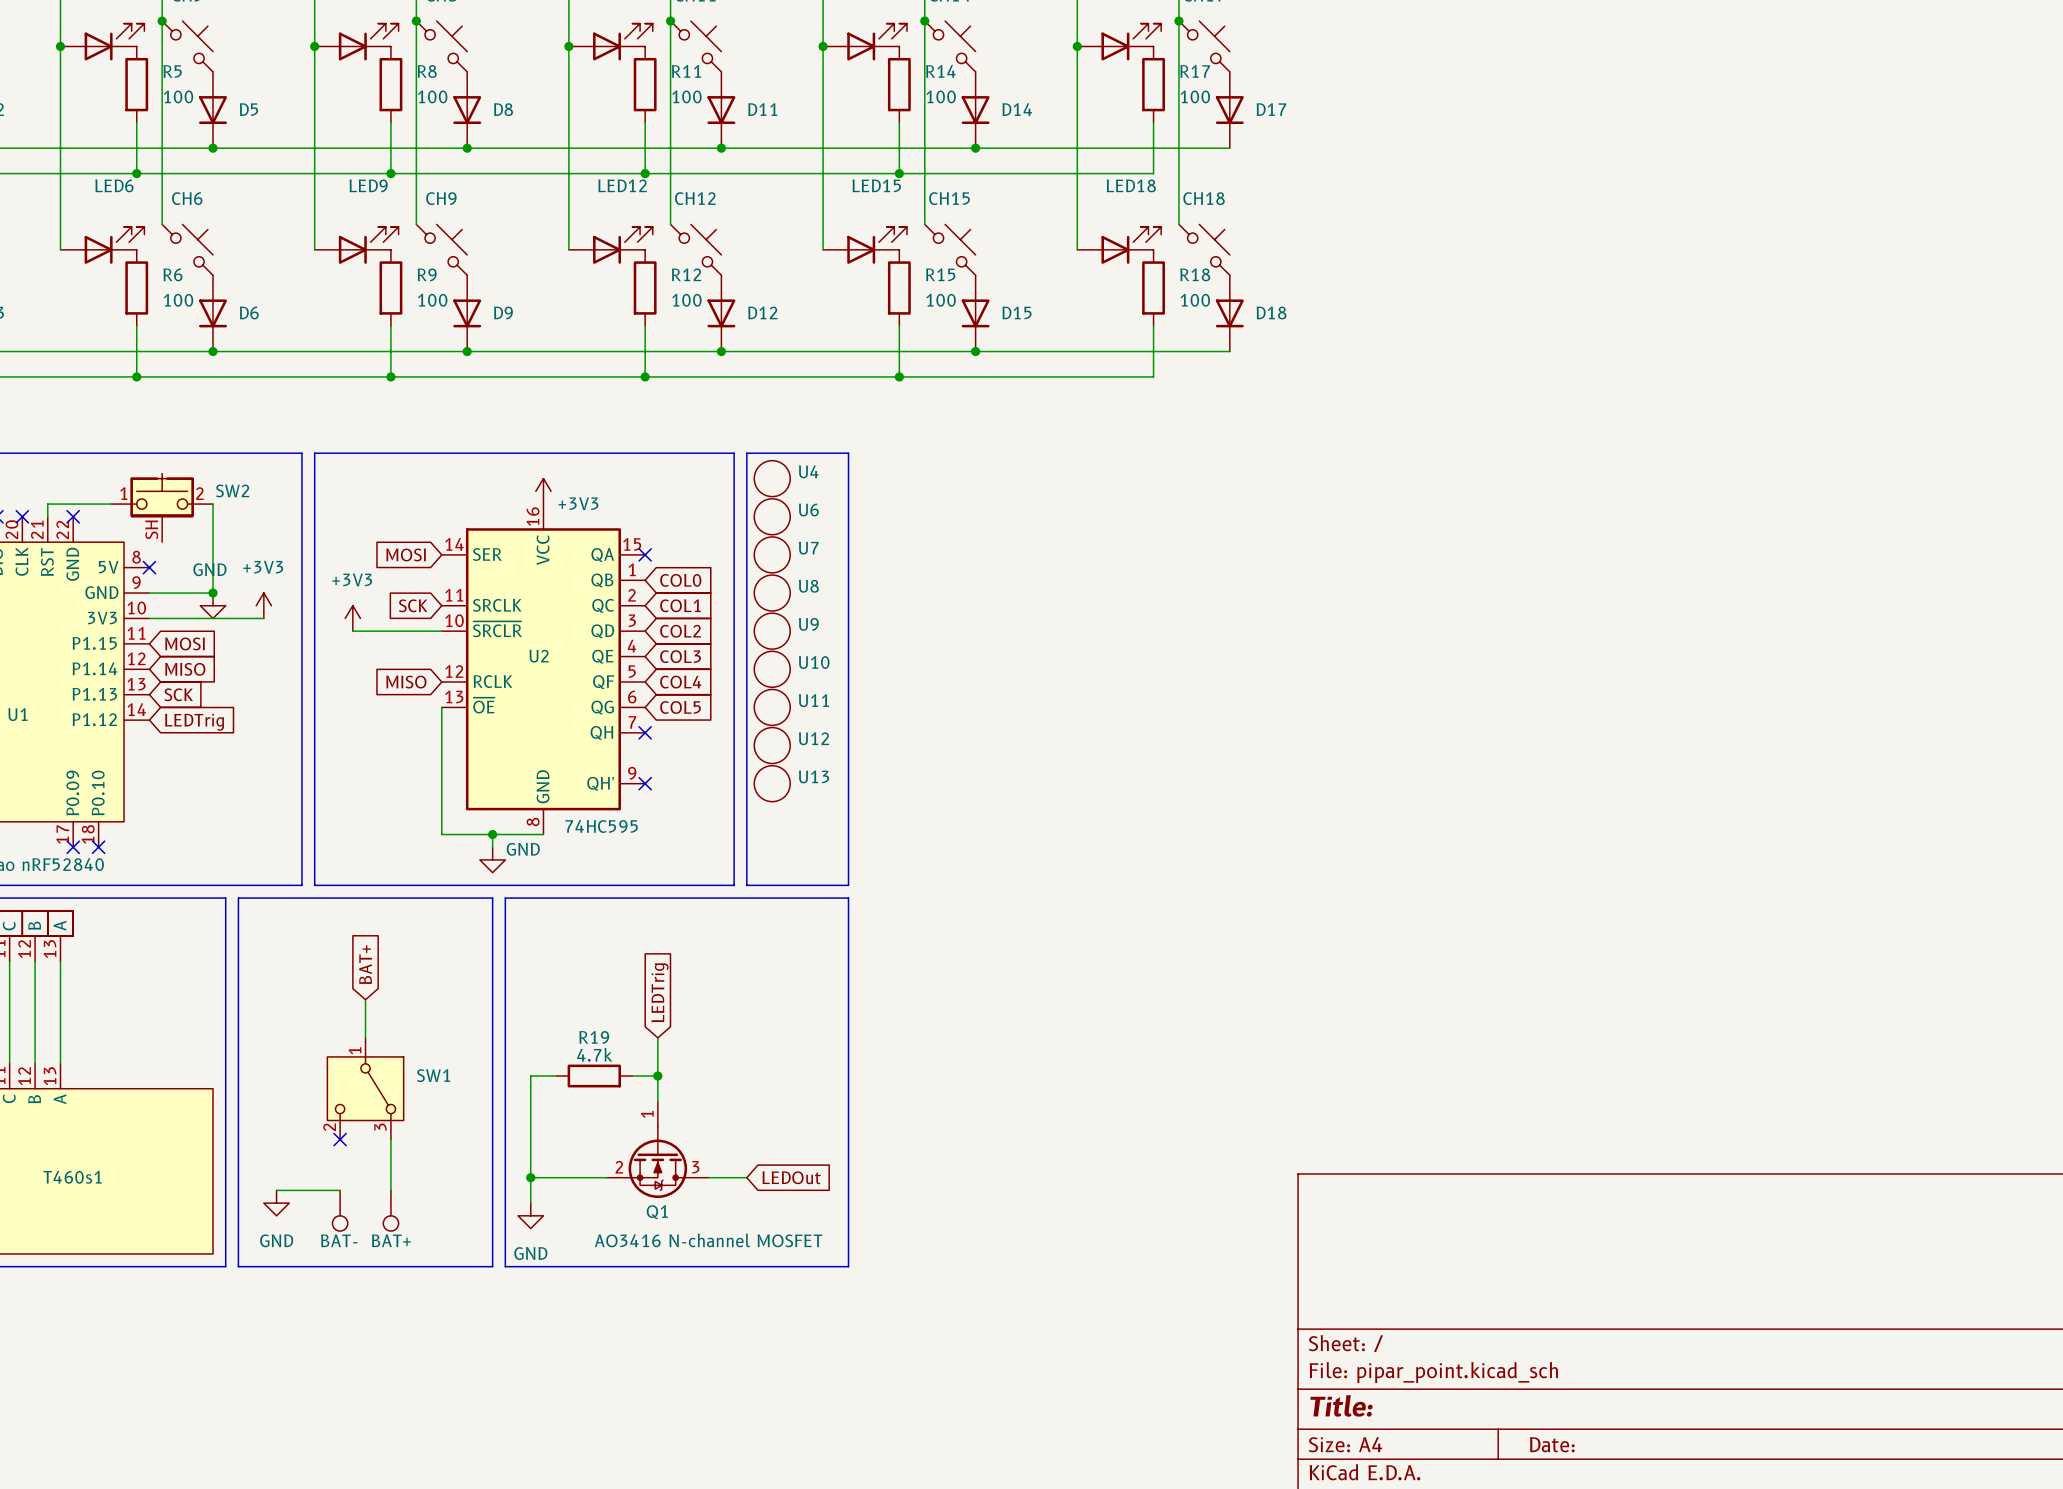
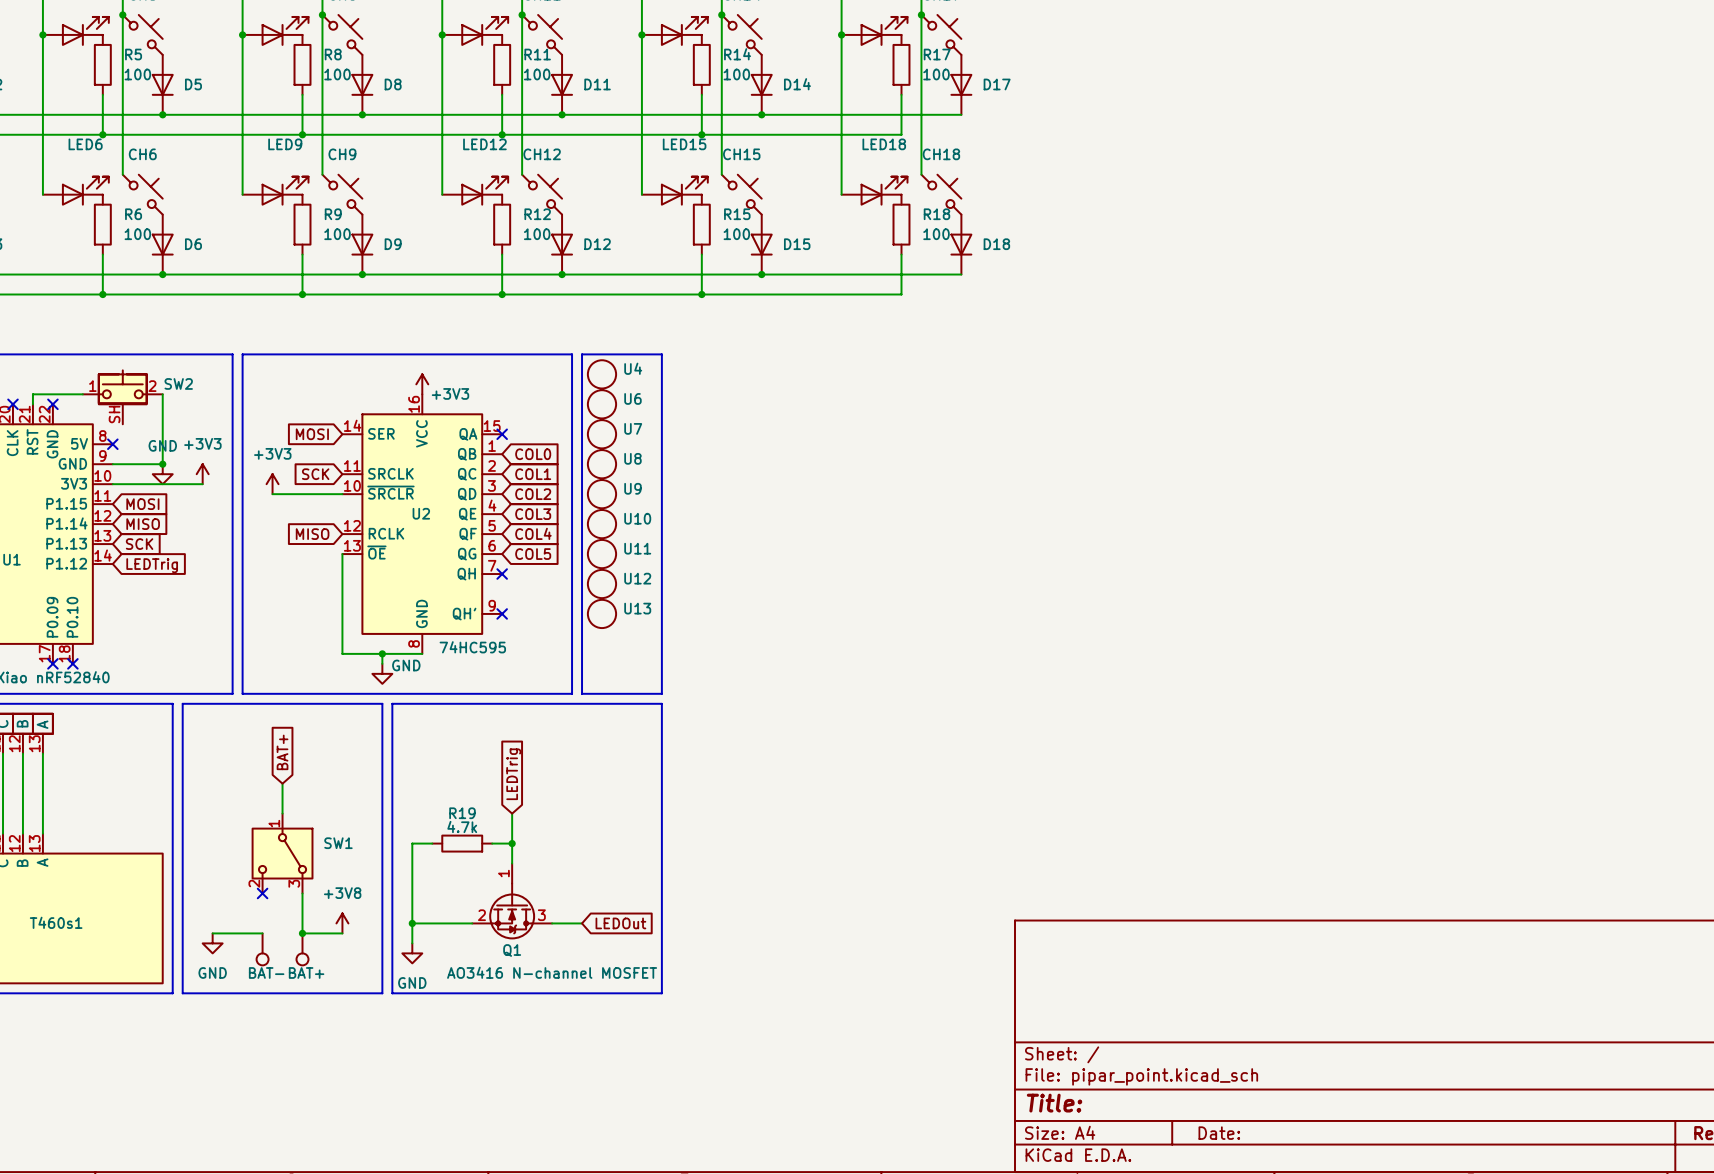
power symbol: none -> +3V8 (342, 923)
wire: none -> (302, 933) (342, 933)
junction: none -> (302, 933)

